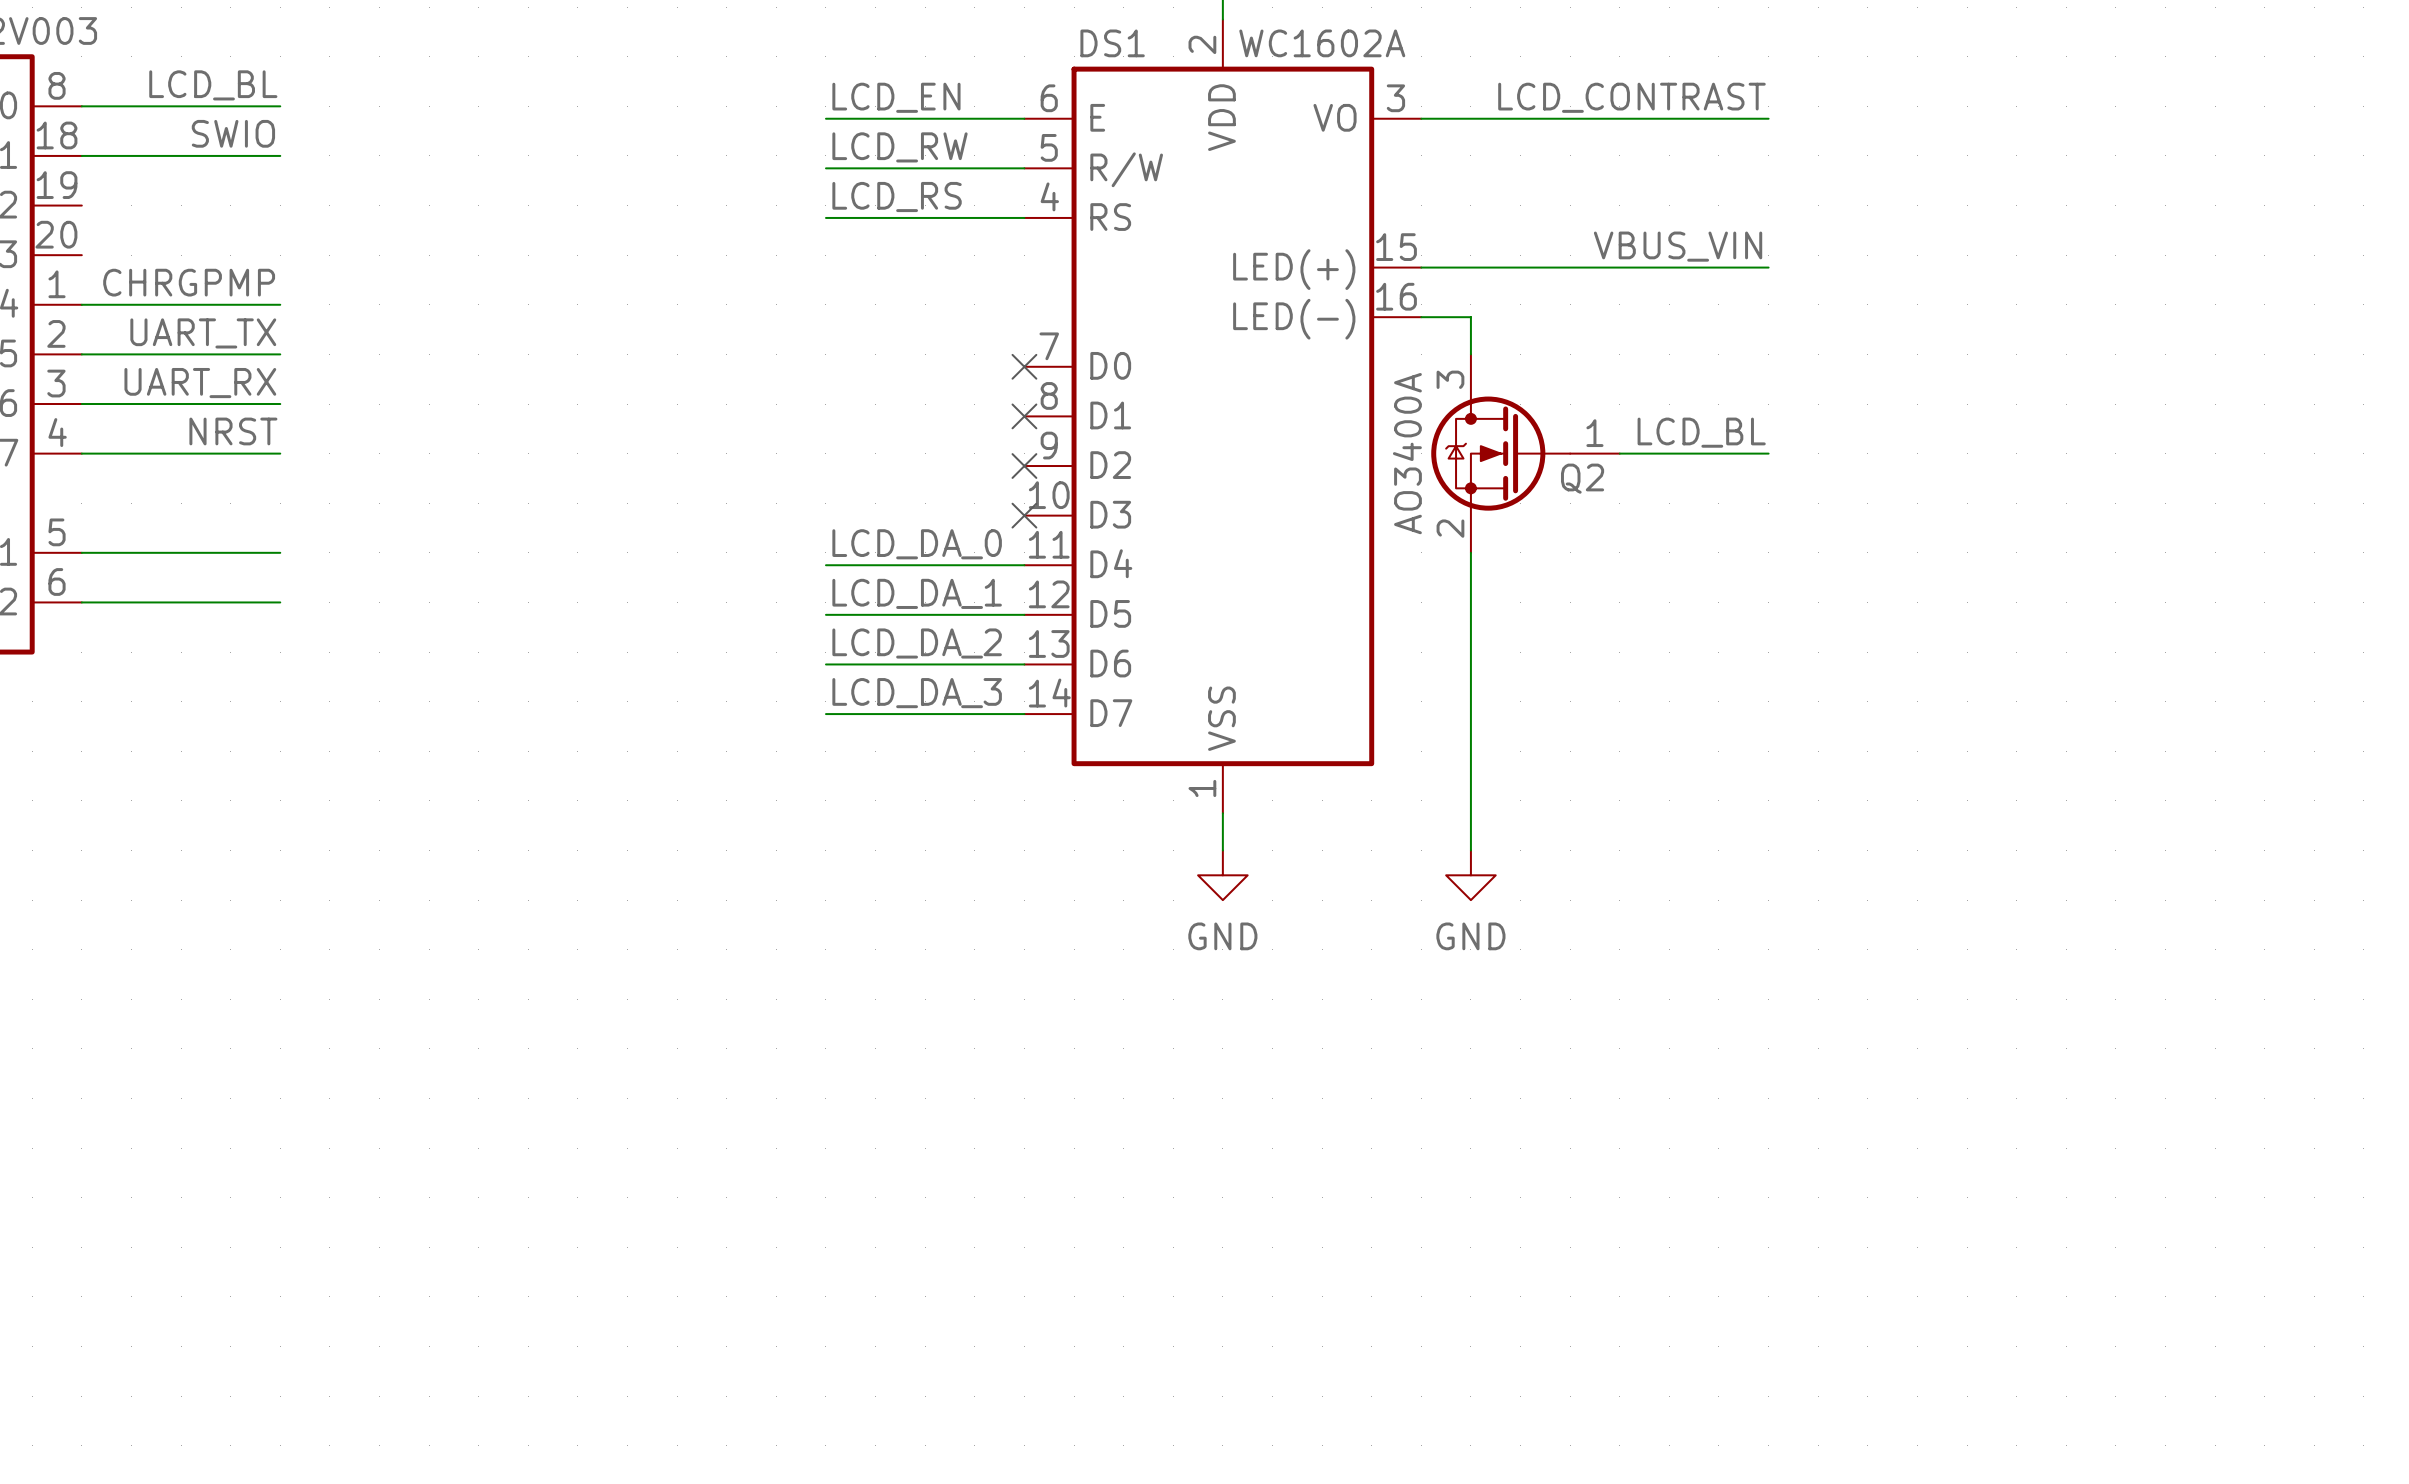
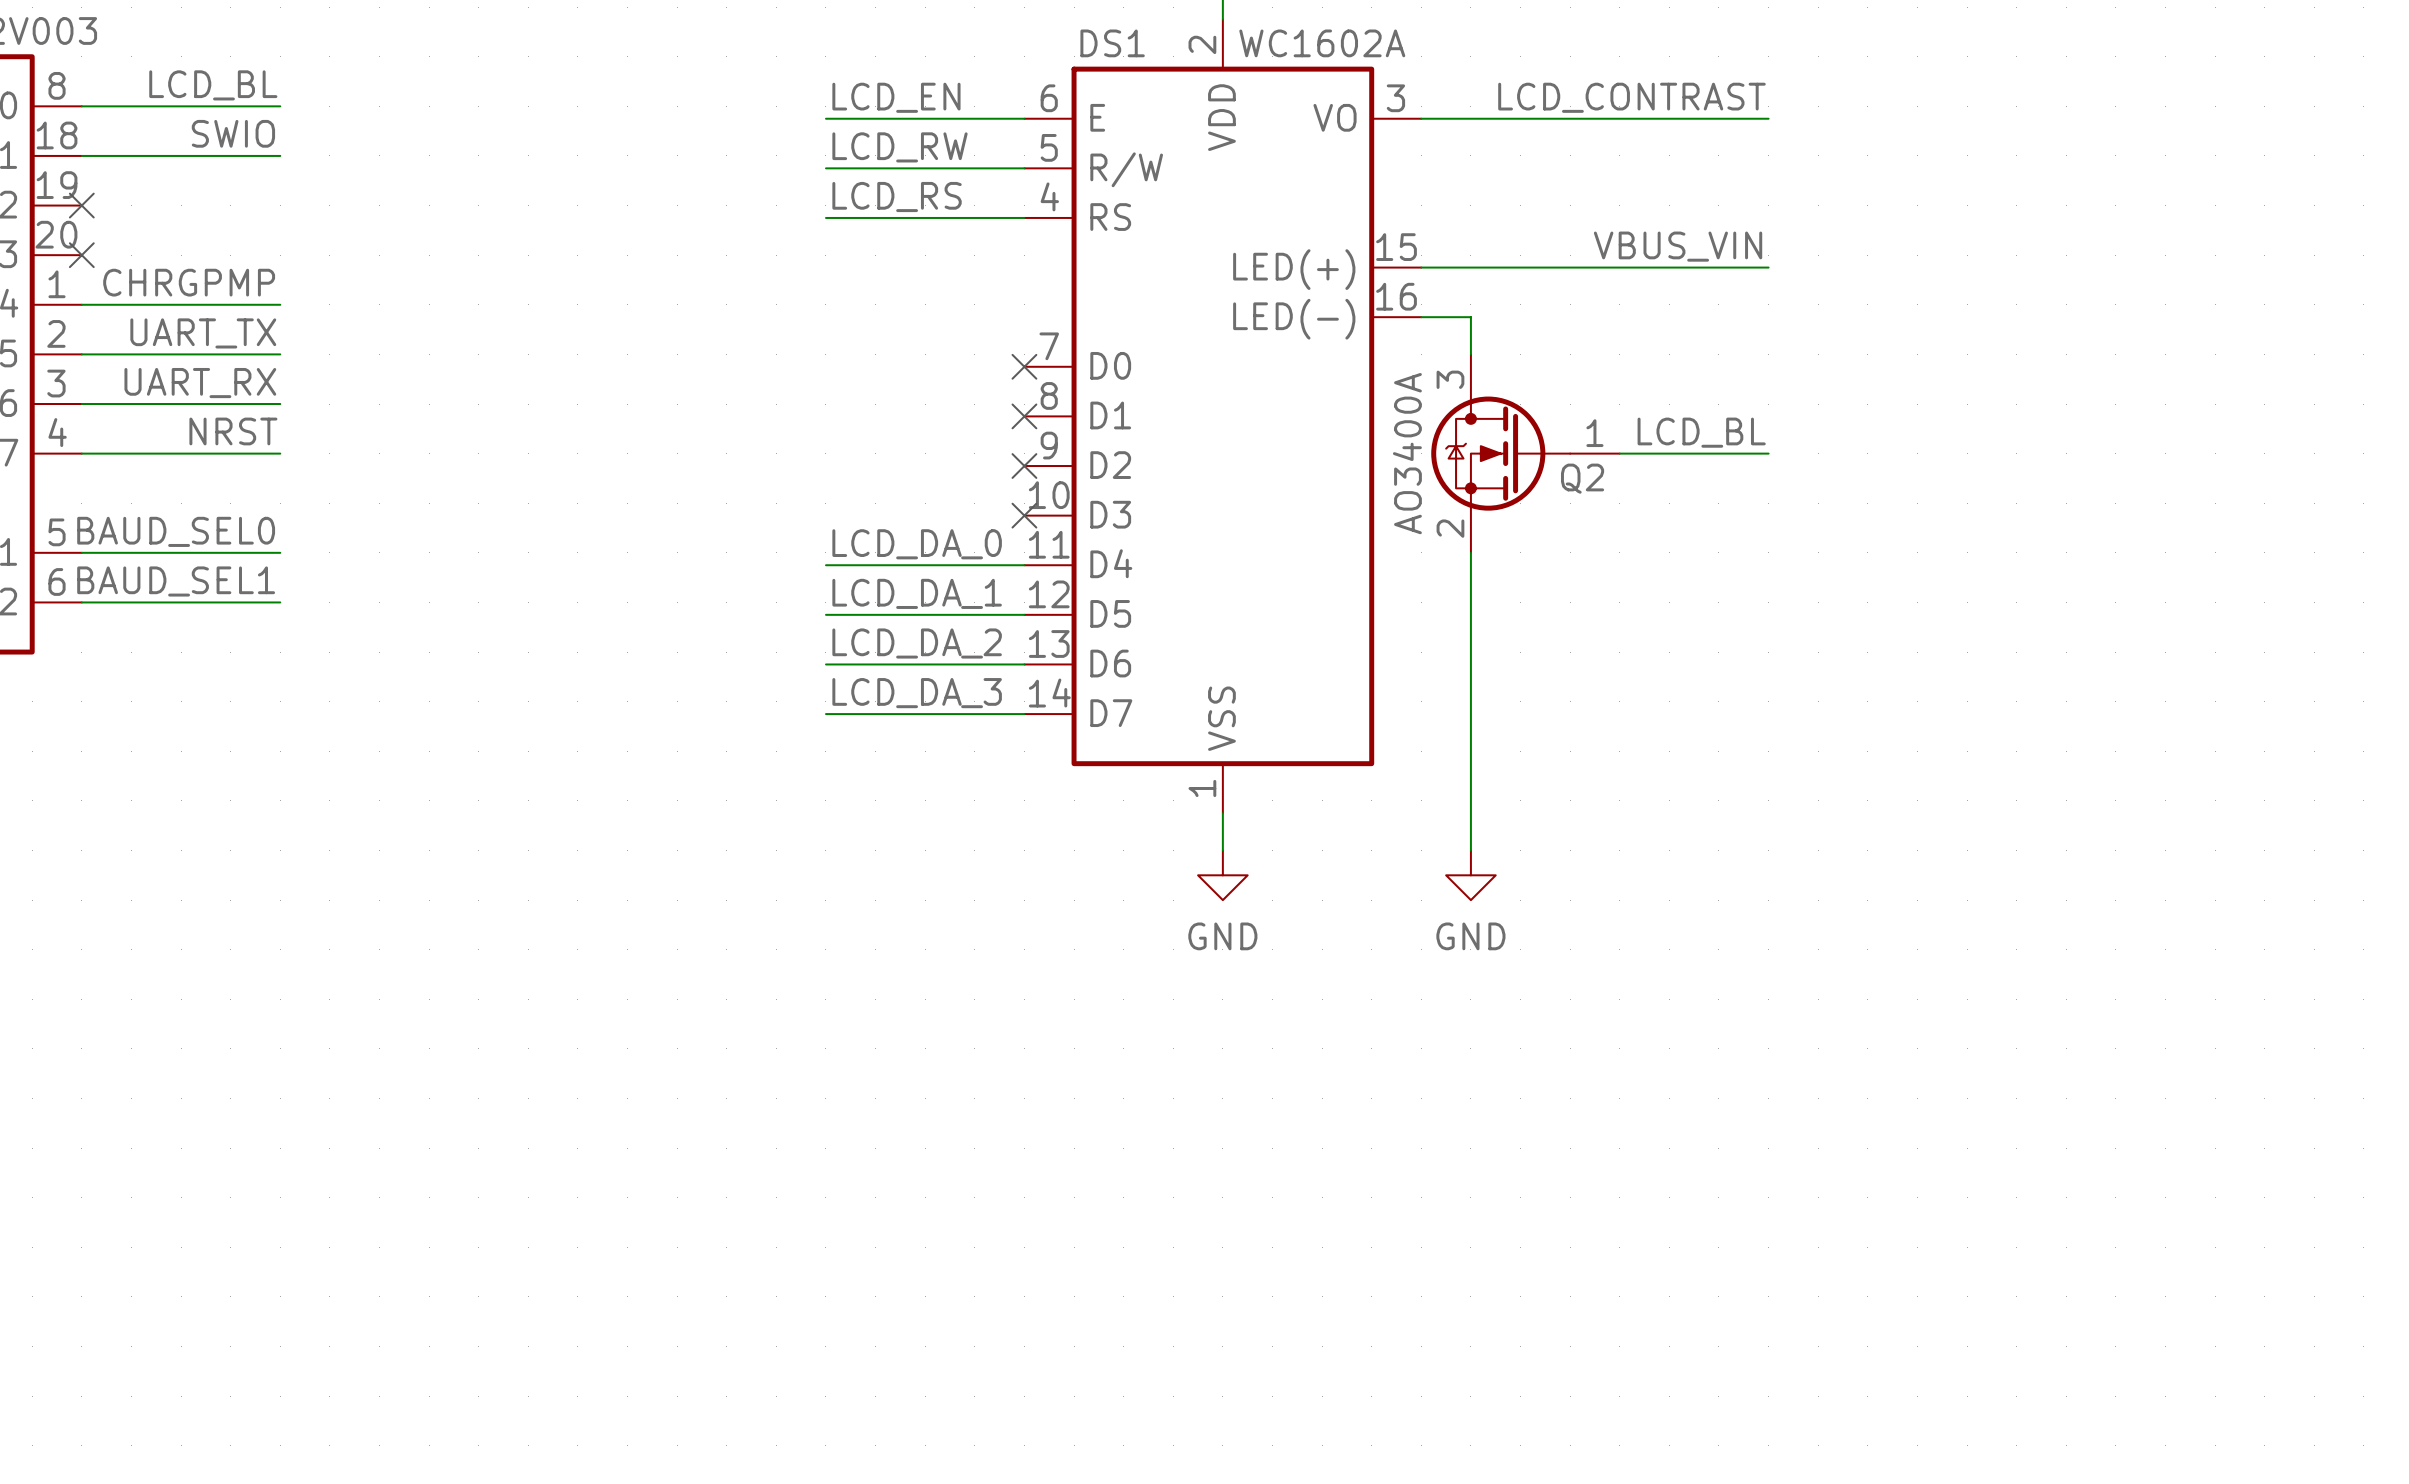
no-connect mark: none -> (81, 205)
no-connect mark: none -> (81, 255)
label: none -> BAUD_SEL0 (176, 531)
label: none -> BAUD_SEL1 (176, 581)

